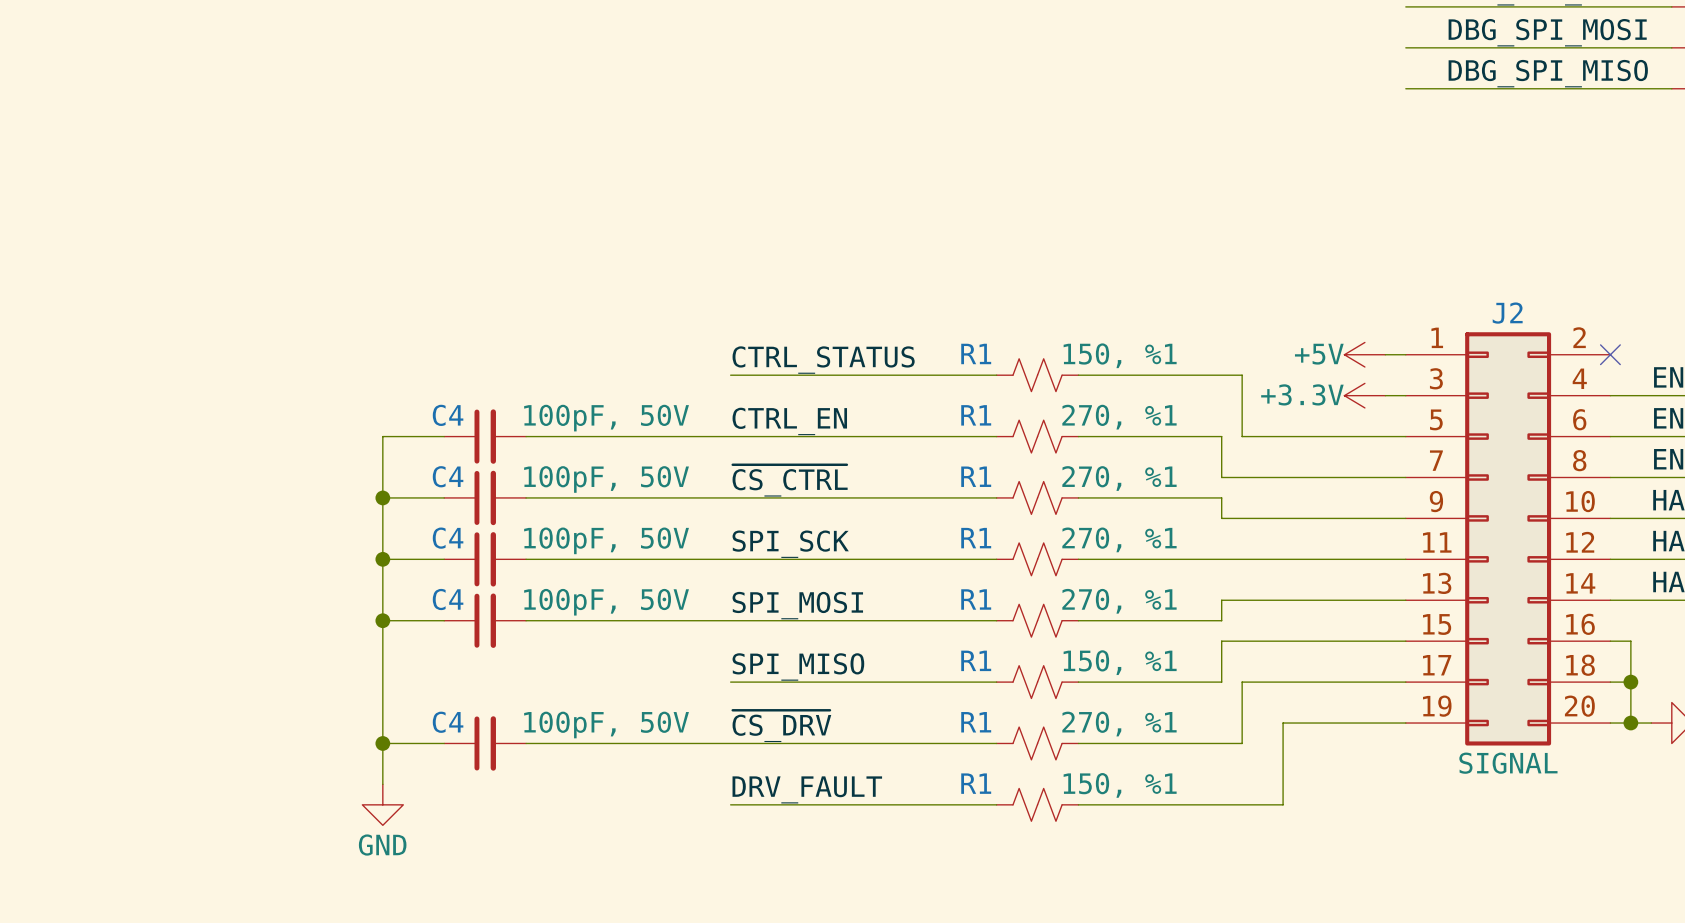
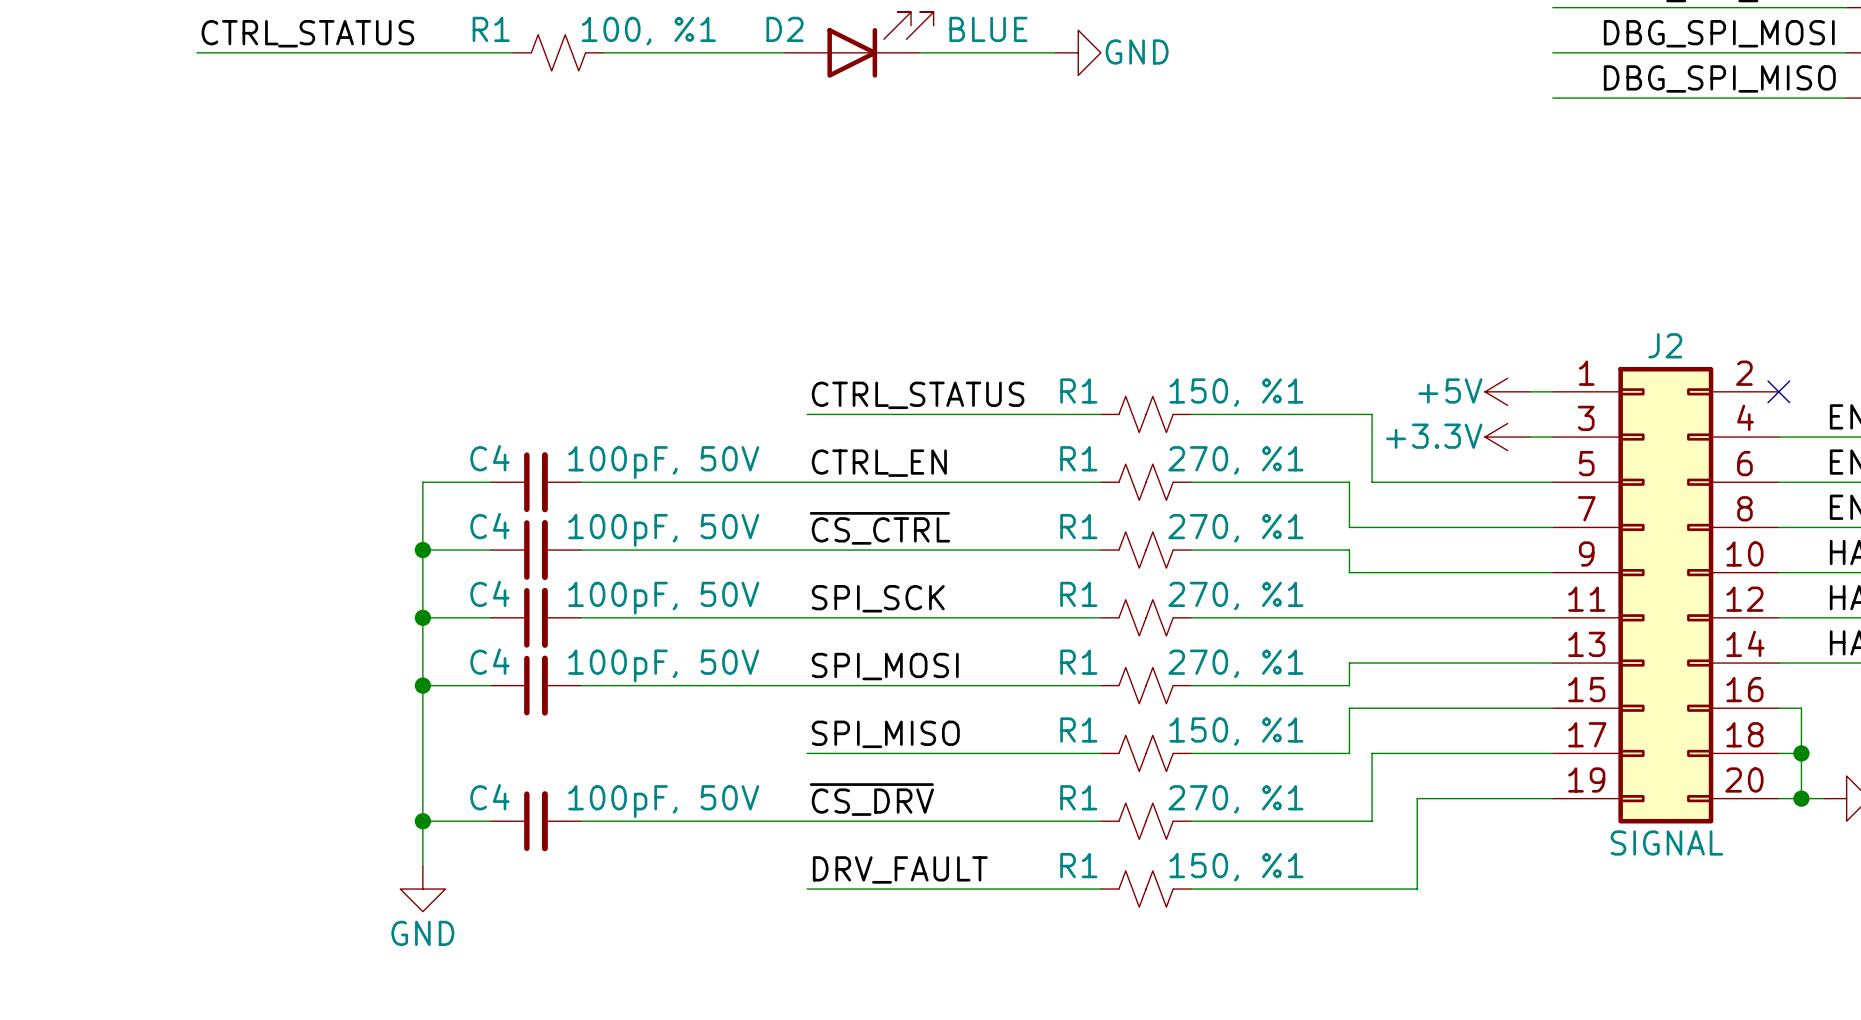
label: none -> CTRL_STATUS (307, 33)
D2: none -> BLUE (859, 44)
wire: none -> (196, 52) (513, 52)
R1: none -> 100, %1 (558, 52)
wire: none -> (603, 52) (784, 52)
wire: none -> (920, 52) (1055, 52)
power symbol: none -> GND (1078, 52)

